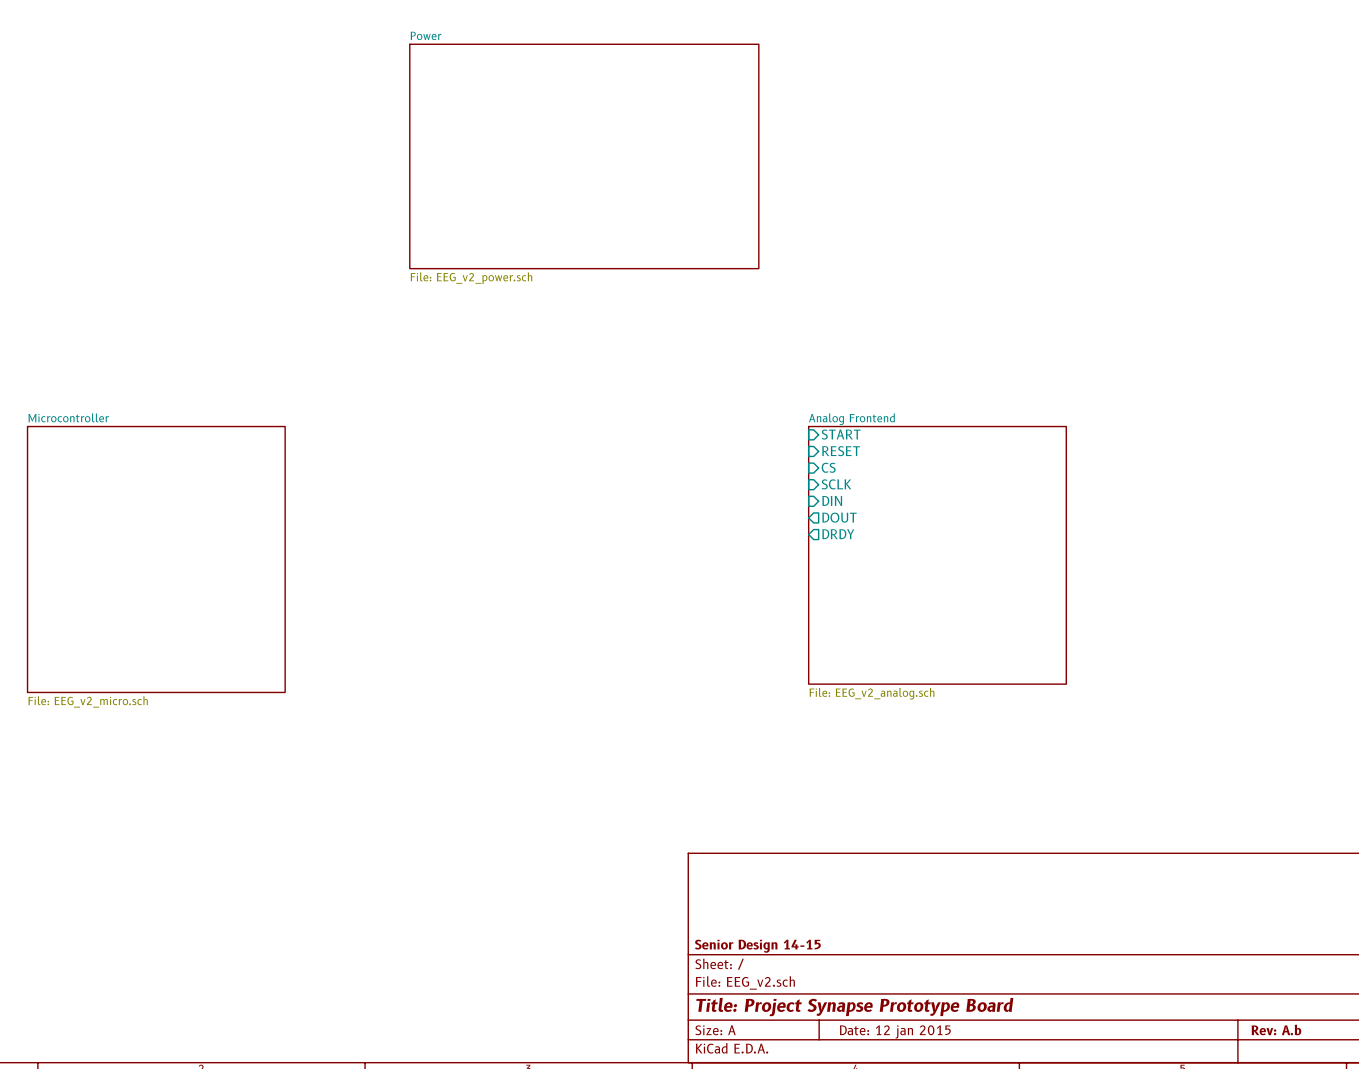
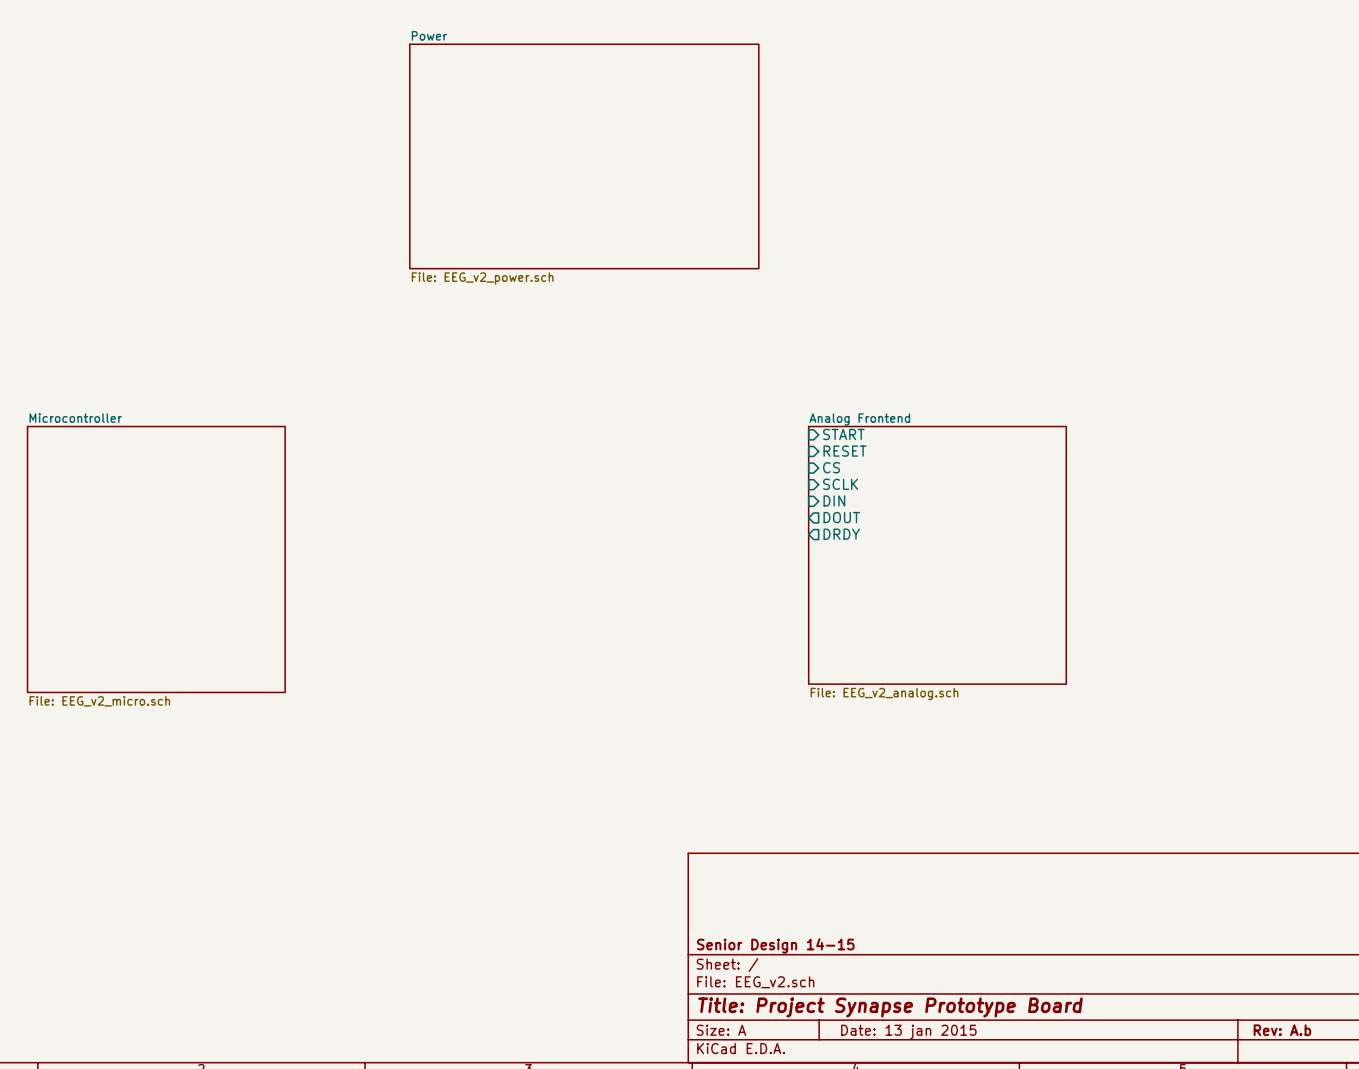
title block: Date: 12 jan 2015 (895, 1031) -> Date: 13 jan 2015 (908, 1031)

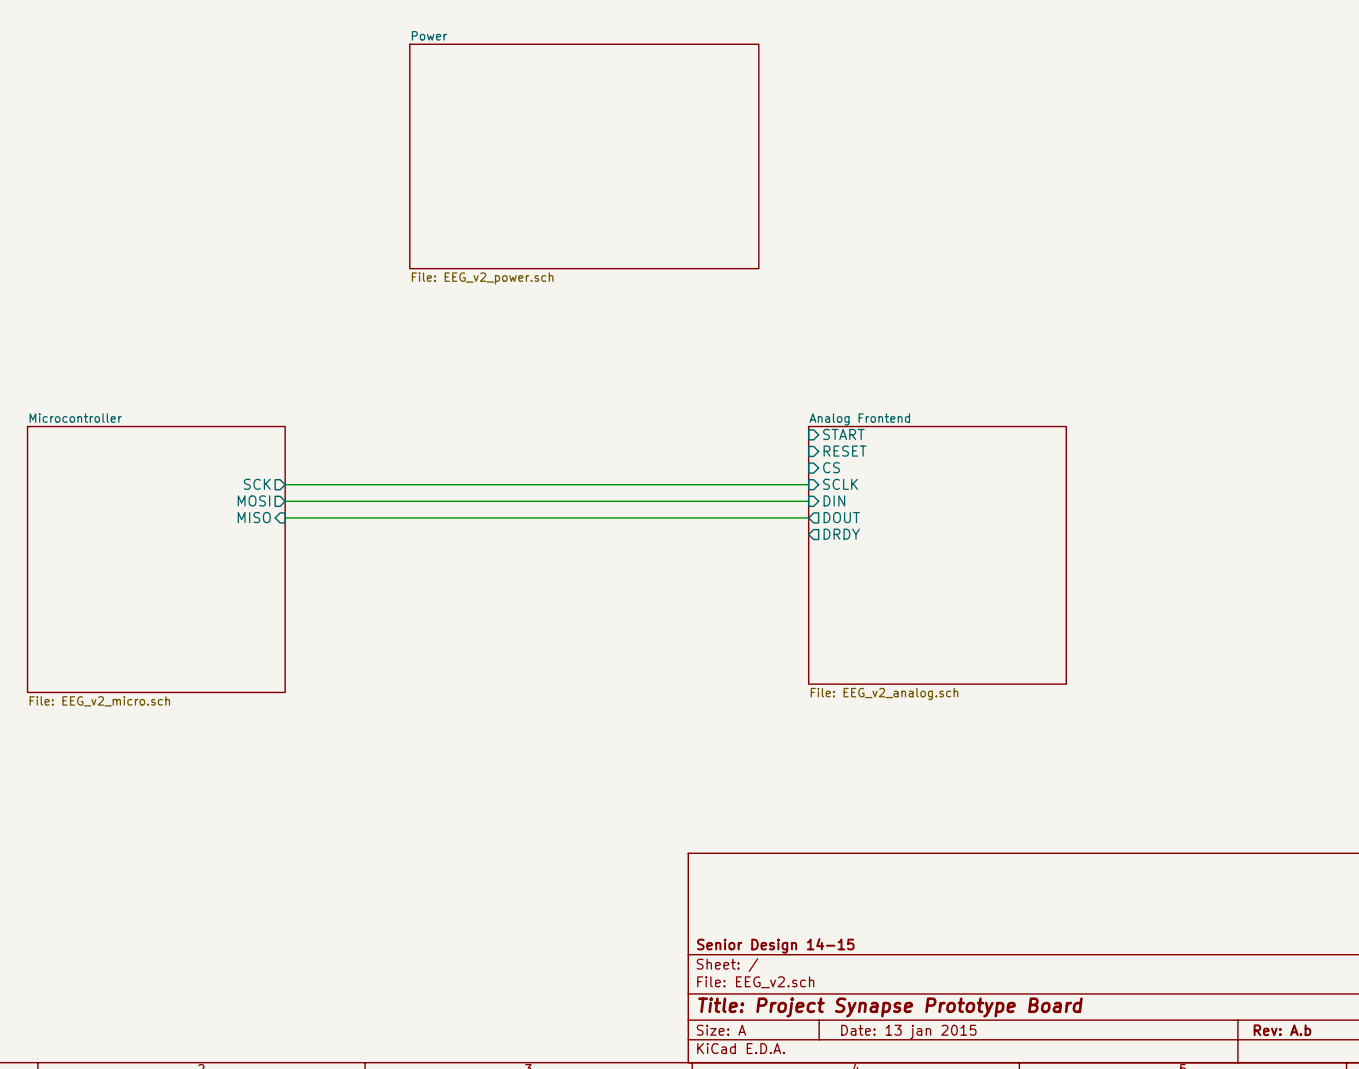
sheet pin: none -> SCK (257, 484)
wire: none -> (285, 484) (808, 484)
sheet pin: none -> MOSI (253, 500)
wire: none -> (285, 501) (808, 501)
sheet pin: none -> MISO (254, 517)
wire: none -> (285, 517) (808, 517)

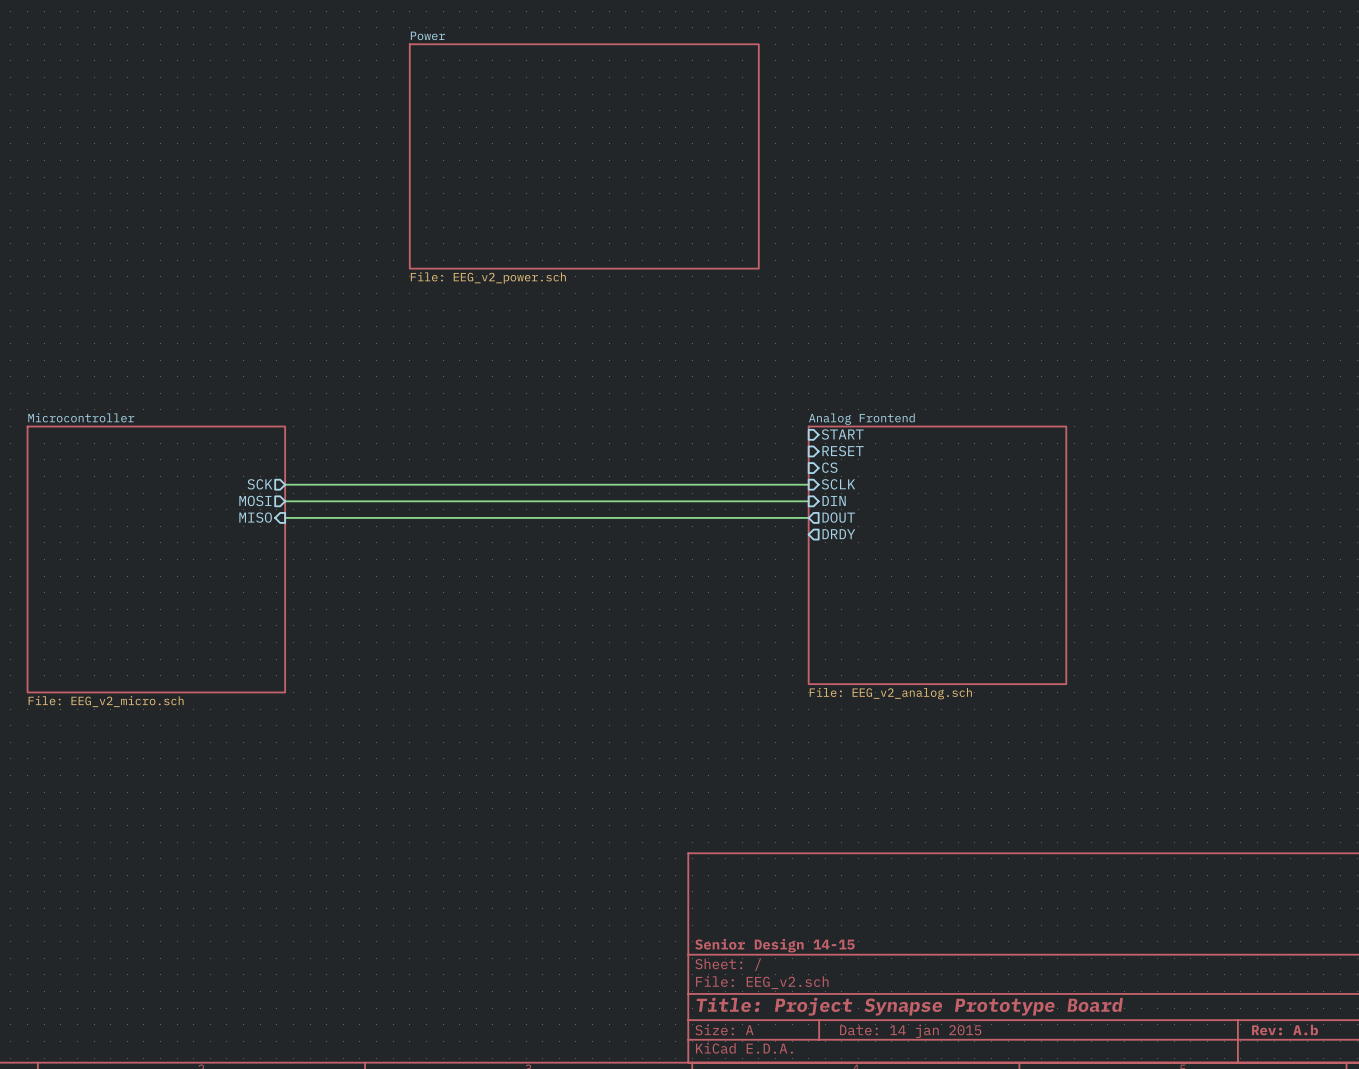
title block: Date: 13 jan 2015 (908, 1031) -> Date: 14 jan 2015 (910, 1031)

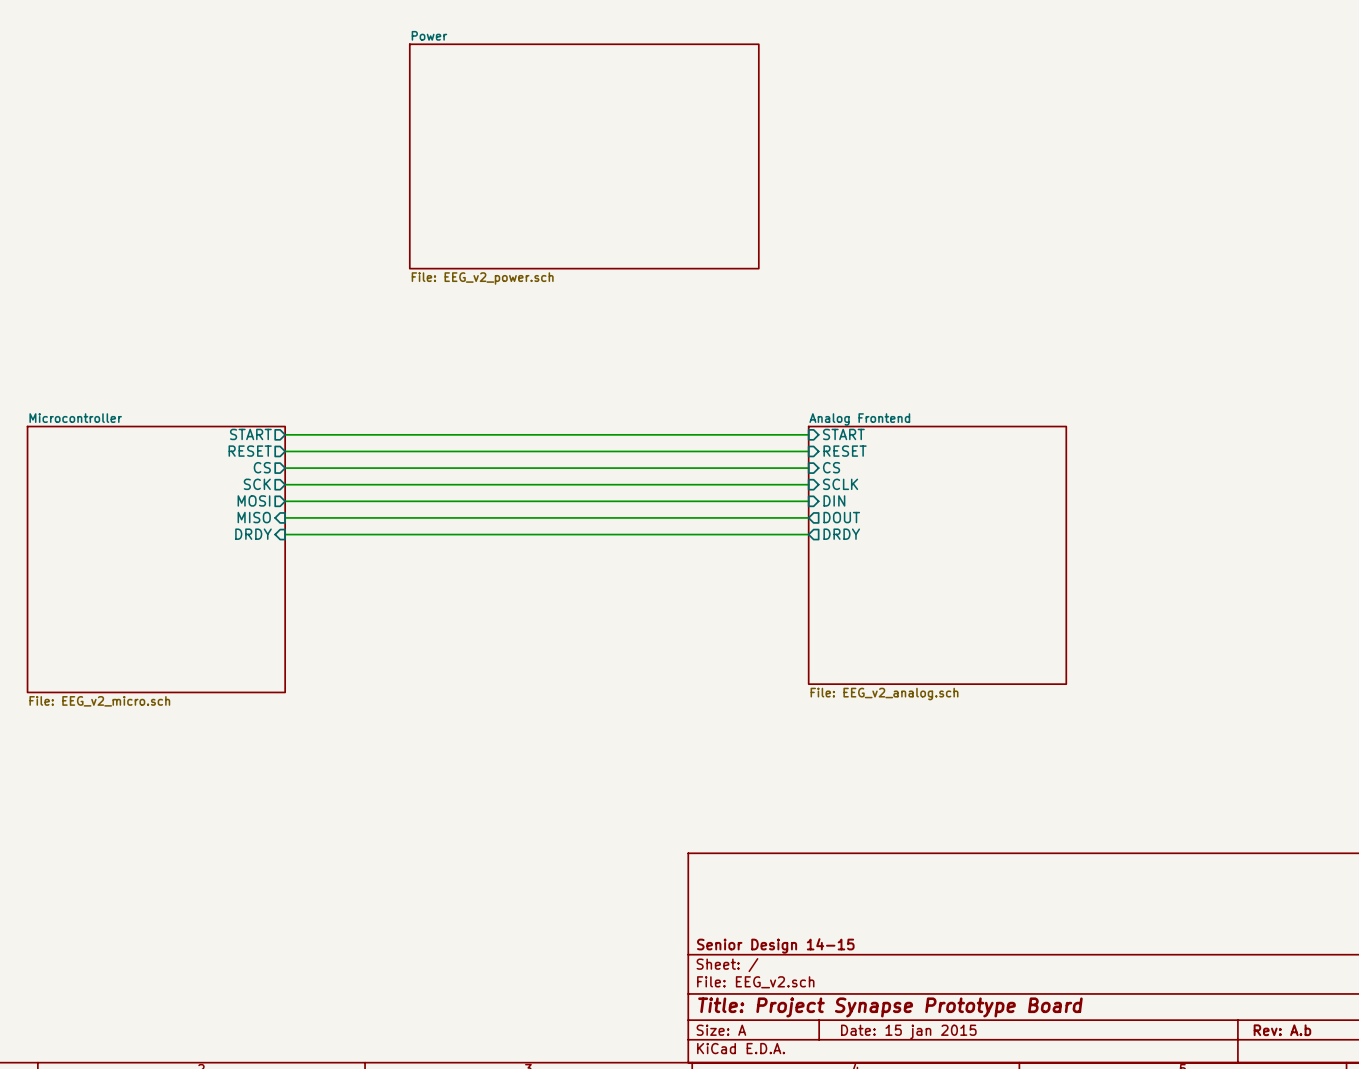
sheet pin: none -> START (250, 434)
wire: none -> (285, 434) (808, 434)
sheet pin: none -> RESET (250, 451)
wire: none -> (285, 451) (808, 451)
sheet pin: none -> CS (262, 467)
wire: none -> (285, 468) (808, 468)
sheet pin: none -> DRDY (253, 534)
wire: none -> (285, 534) (808, 534)
title block: Date: 14 jan 2015 (910, 1031) -> Date: 15 jan 2015 (908, 1031)

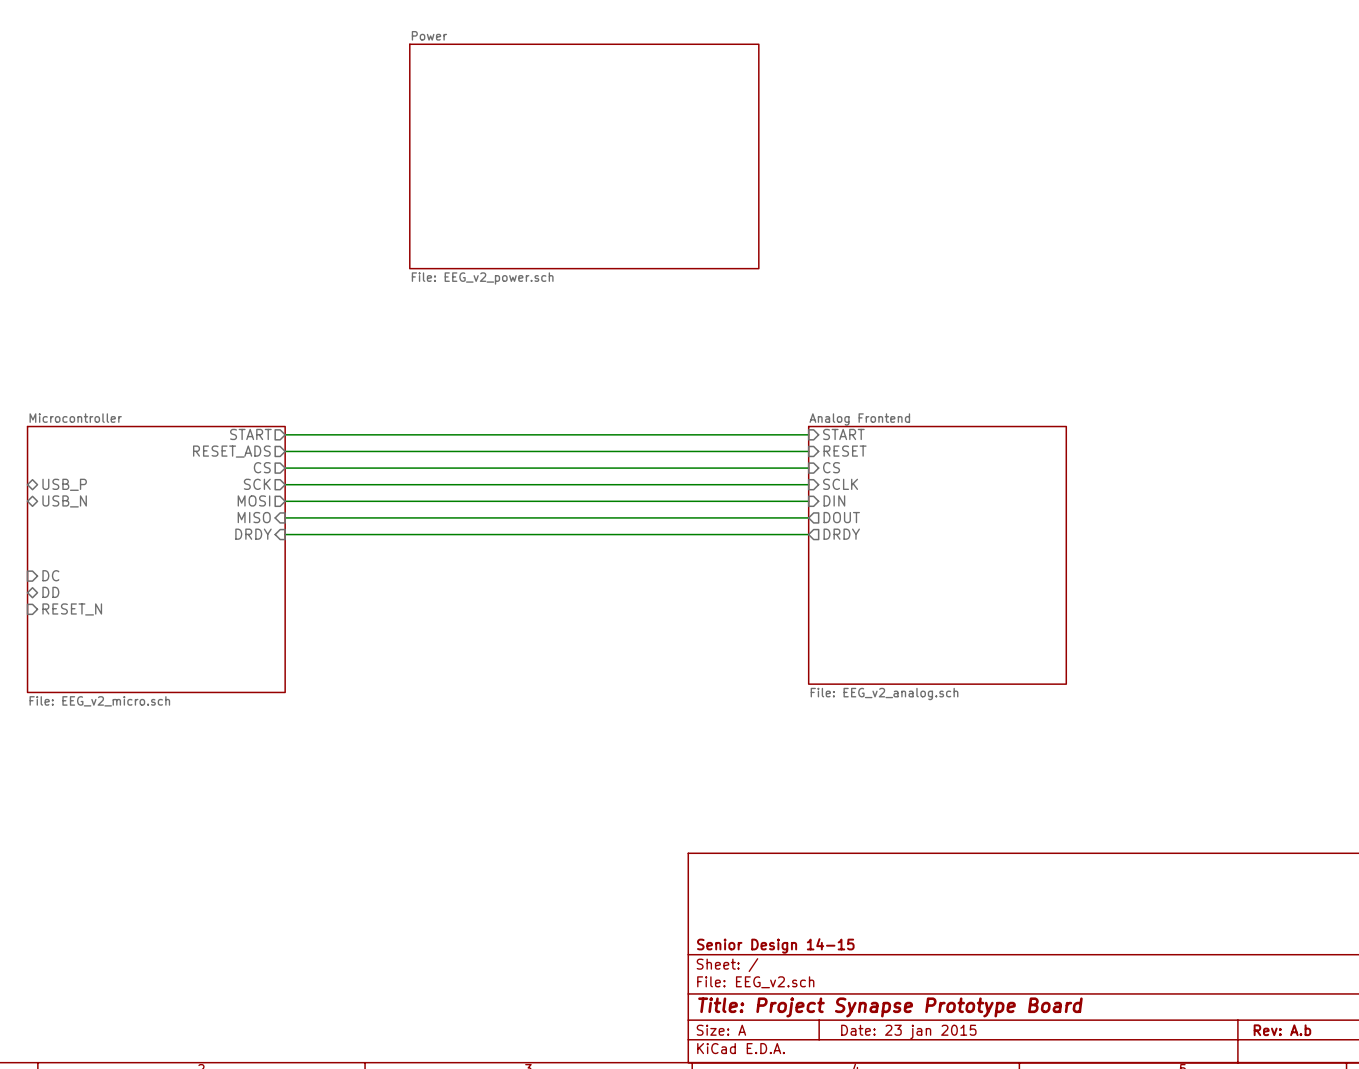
sheet pin: RESET (250, 451) -> RESET_ADS (231, 451)
sheet pin: none -> USB_P (64, 484)
sheet pin: none -> USB_N (64, 501)
sheet pin: none -> DC (50, 575)
sheet pin: none -> DD (50, 592)
sheet pin: none -> RESET_N (72, 609)
title block: Date: 15 jan 2015 (908, 1031) -> Date: 23 jan 2015 (908, 1031)

